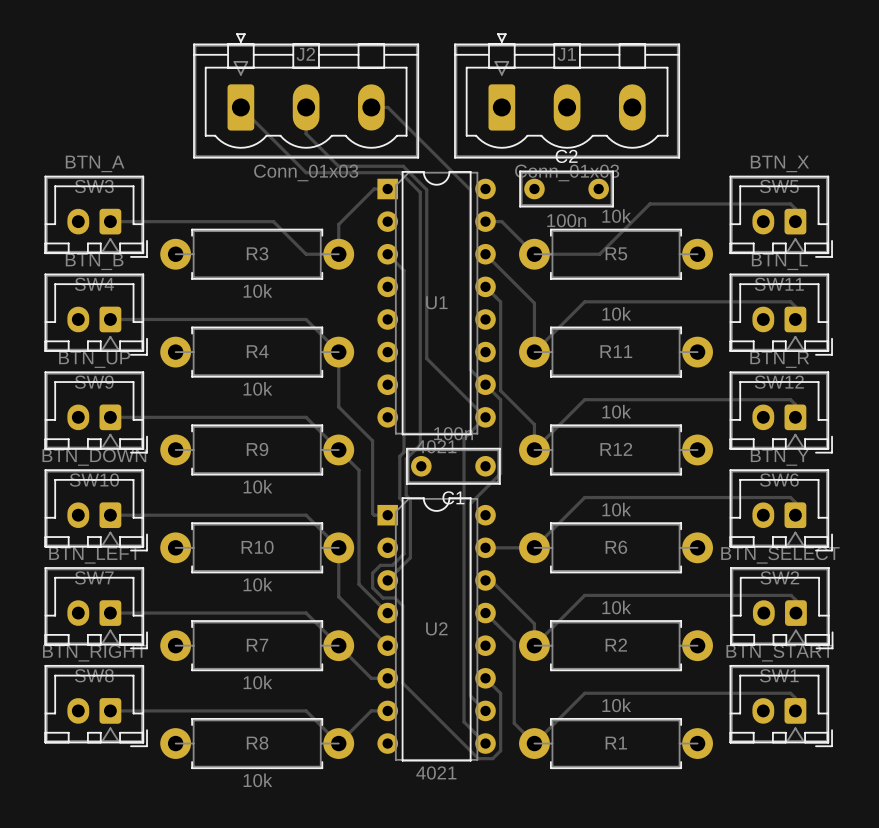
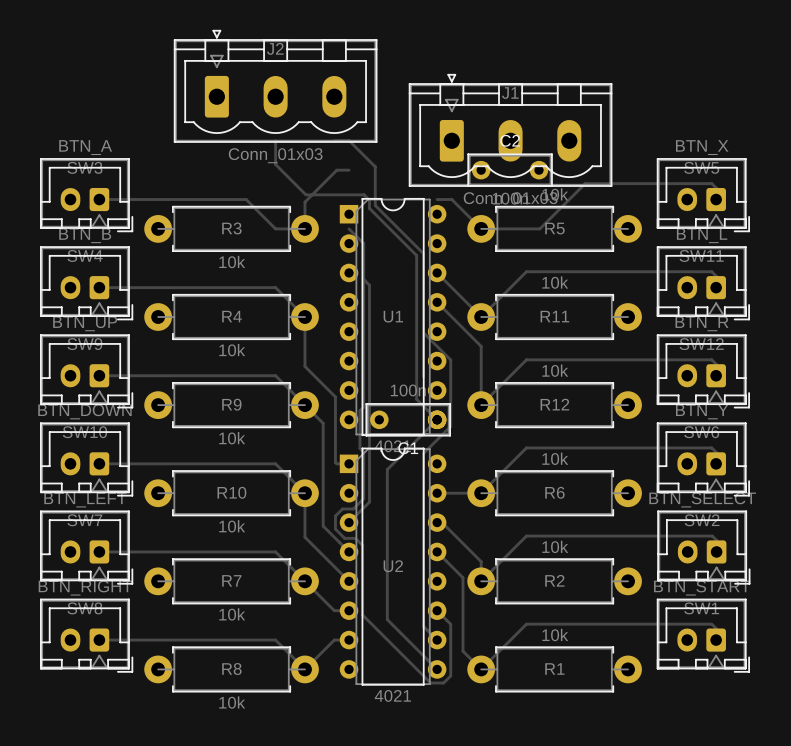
J1 position: (567, 95) -> (510, 130)
track: (240, 107) (306, 172) (400, 172) (420, 192) (420, 444) (406, 459) (406, 495) (410, 499) -> (363, 279) (369, 285) (369, 449)
track: (306, 107) (306, 133) (338, 166) (403, 166) (426, 189) (426, 358) (485, 417) (464, 438) (464, 722) -> (275, 140) (275, 164) (305, 194) (364, 194) (369, 200) (369, 208) (416, 255) (416, 399) (437, 419) (387, 469) (387, 619) (417, 650)
track: (371, 107) (387, 107) (470, 189) (470, 281) -> (334, 140) (349, 140) (375, 166) (375, 205) (423, 253)
track: (485, 254) (534, 303) (534, 352) -> (437, 272) (481, 317)
track: (485, 286) (500, 301) (500, 390) (534, 424) -> (437, 302) (481, 346) (481, 382)
U1 position: (436, 303) -> (393, 317)

